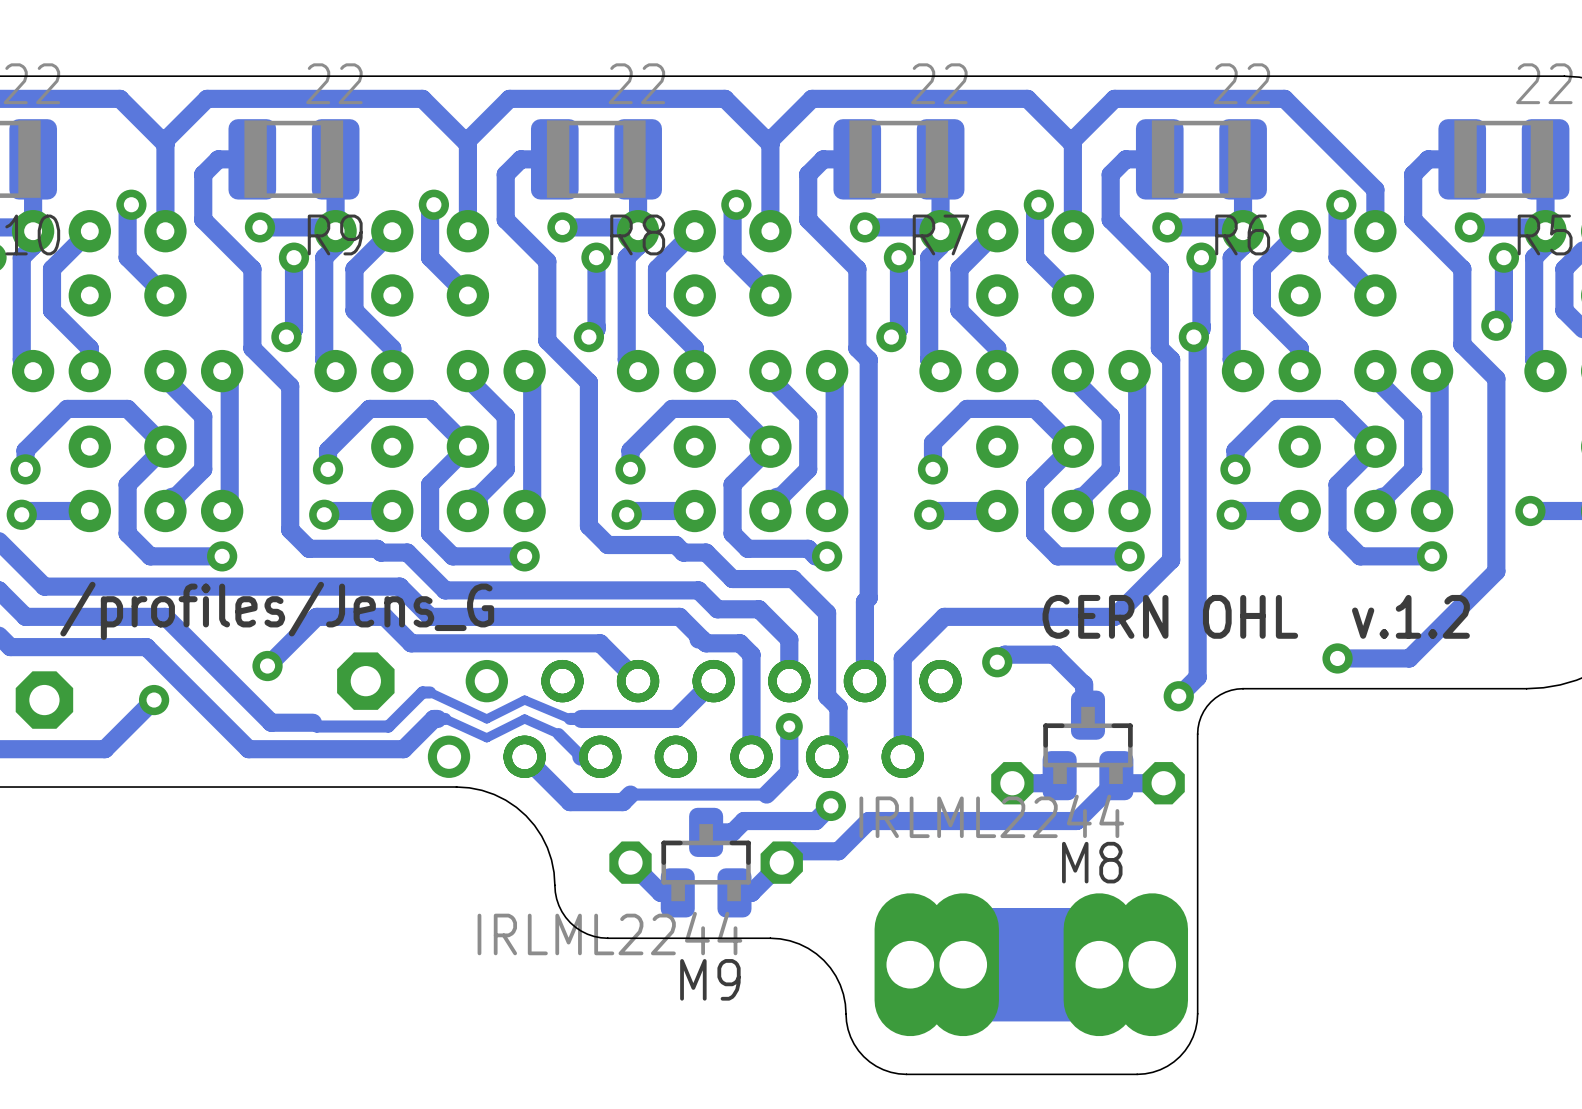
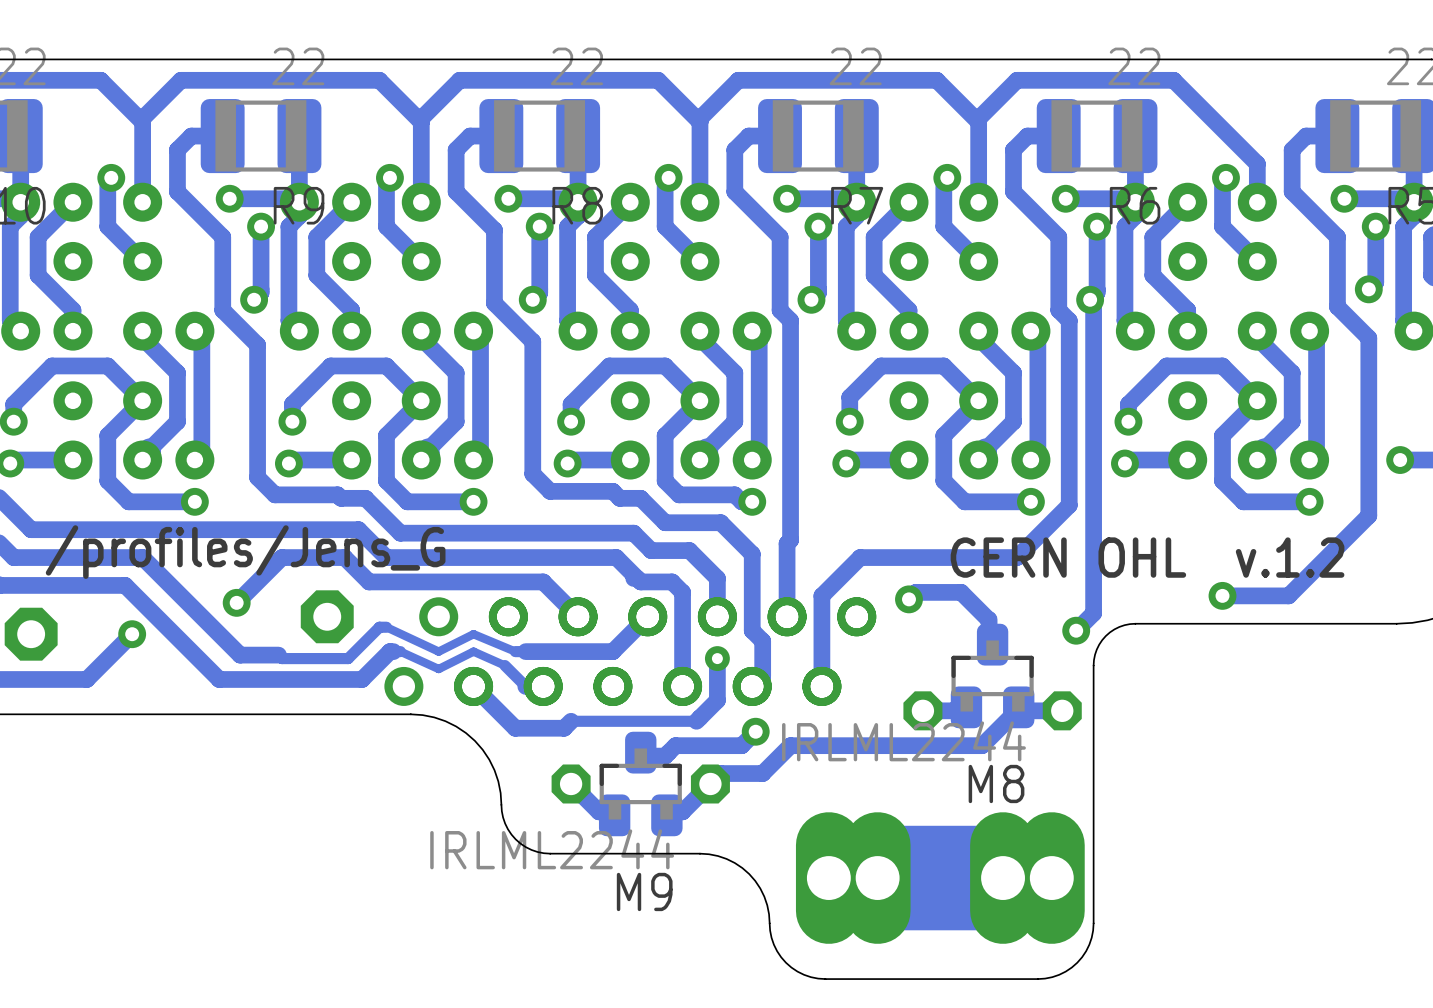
M8 footprint: [1042, 690, 1134, 801] -> [950, 623, 1035, 729]
M9 footprint: [660, 807, 752, 918] -> [598, 731, 683, 837]

